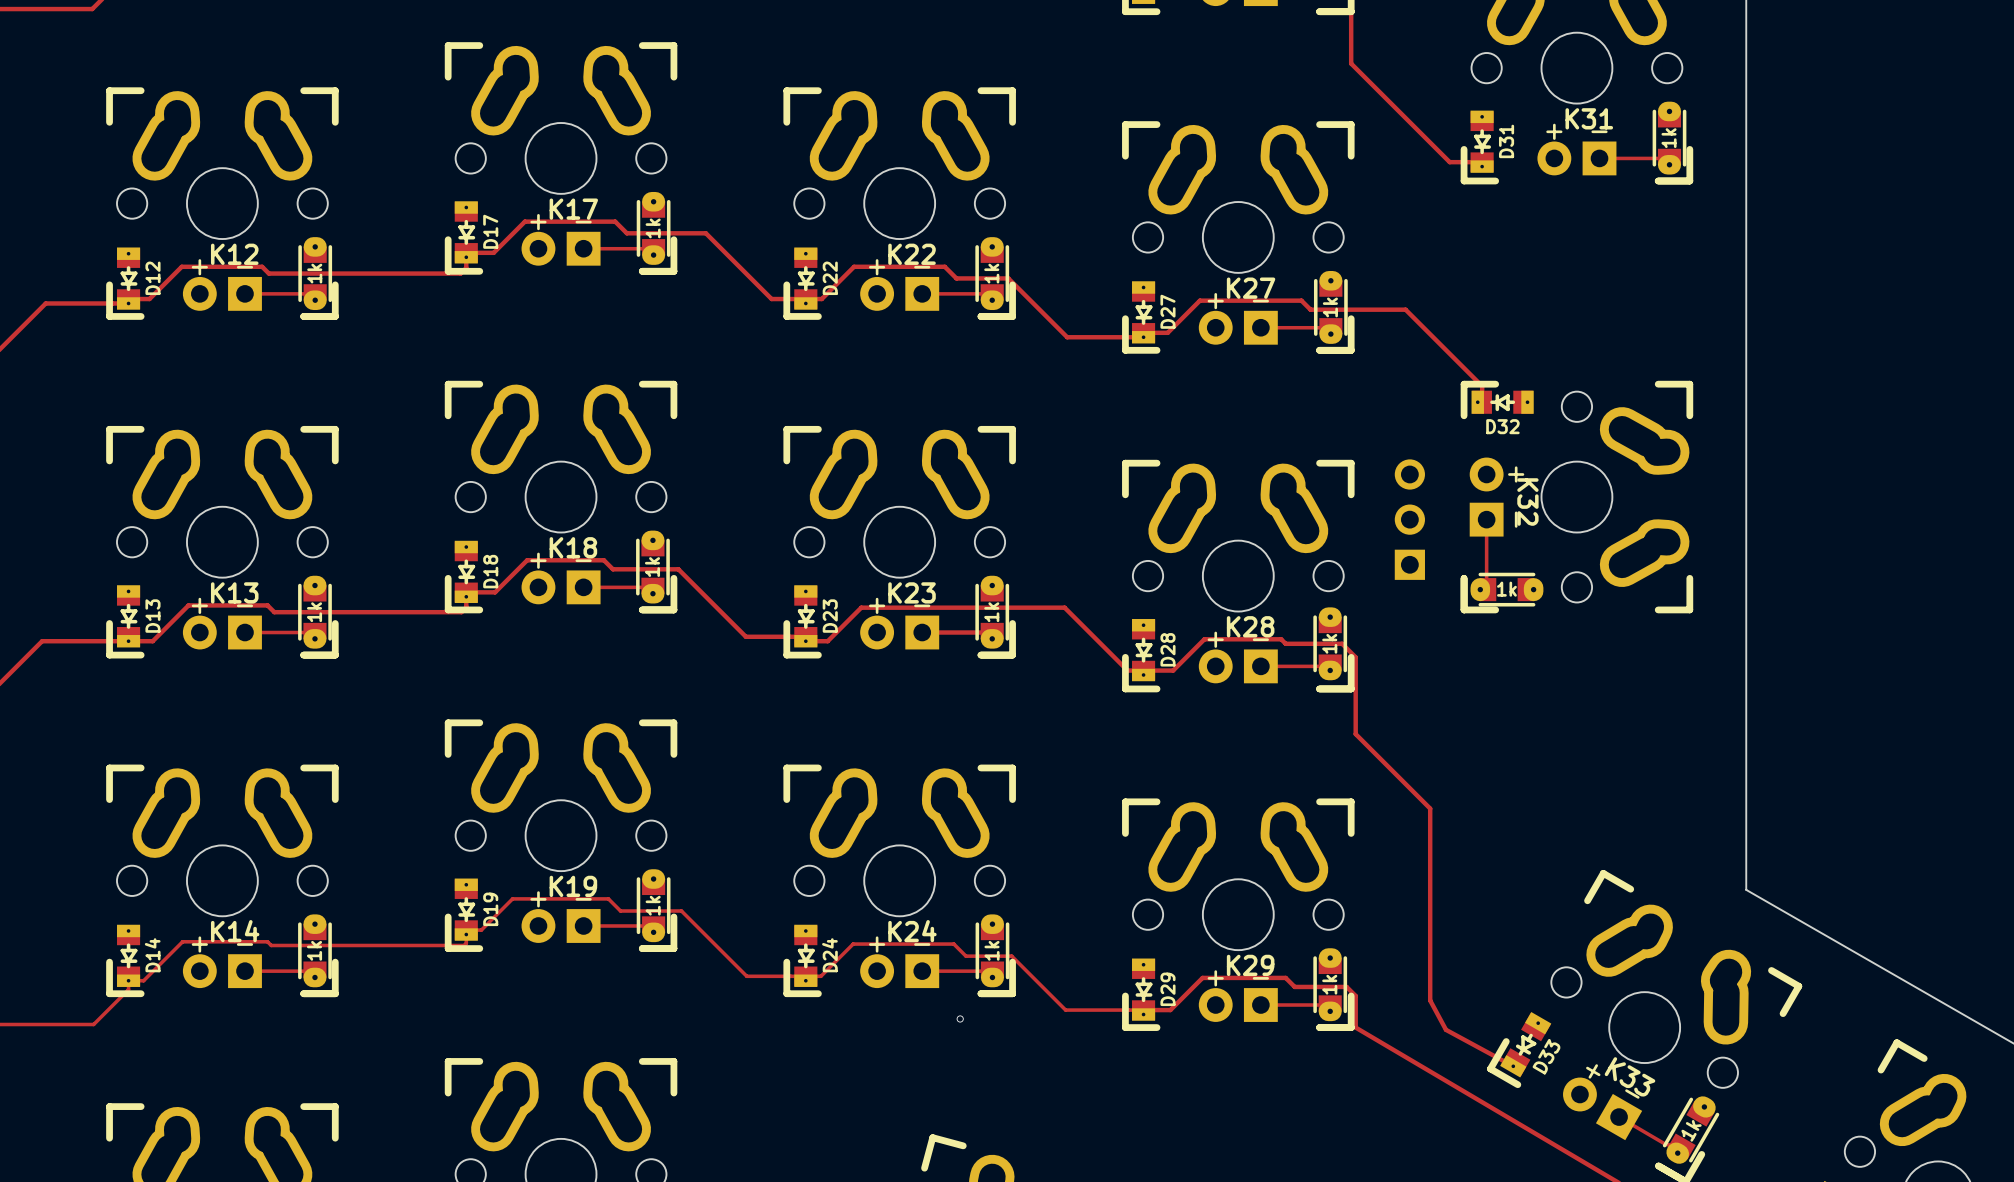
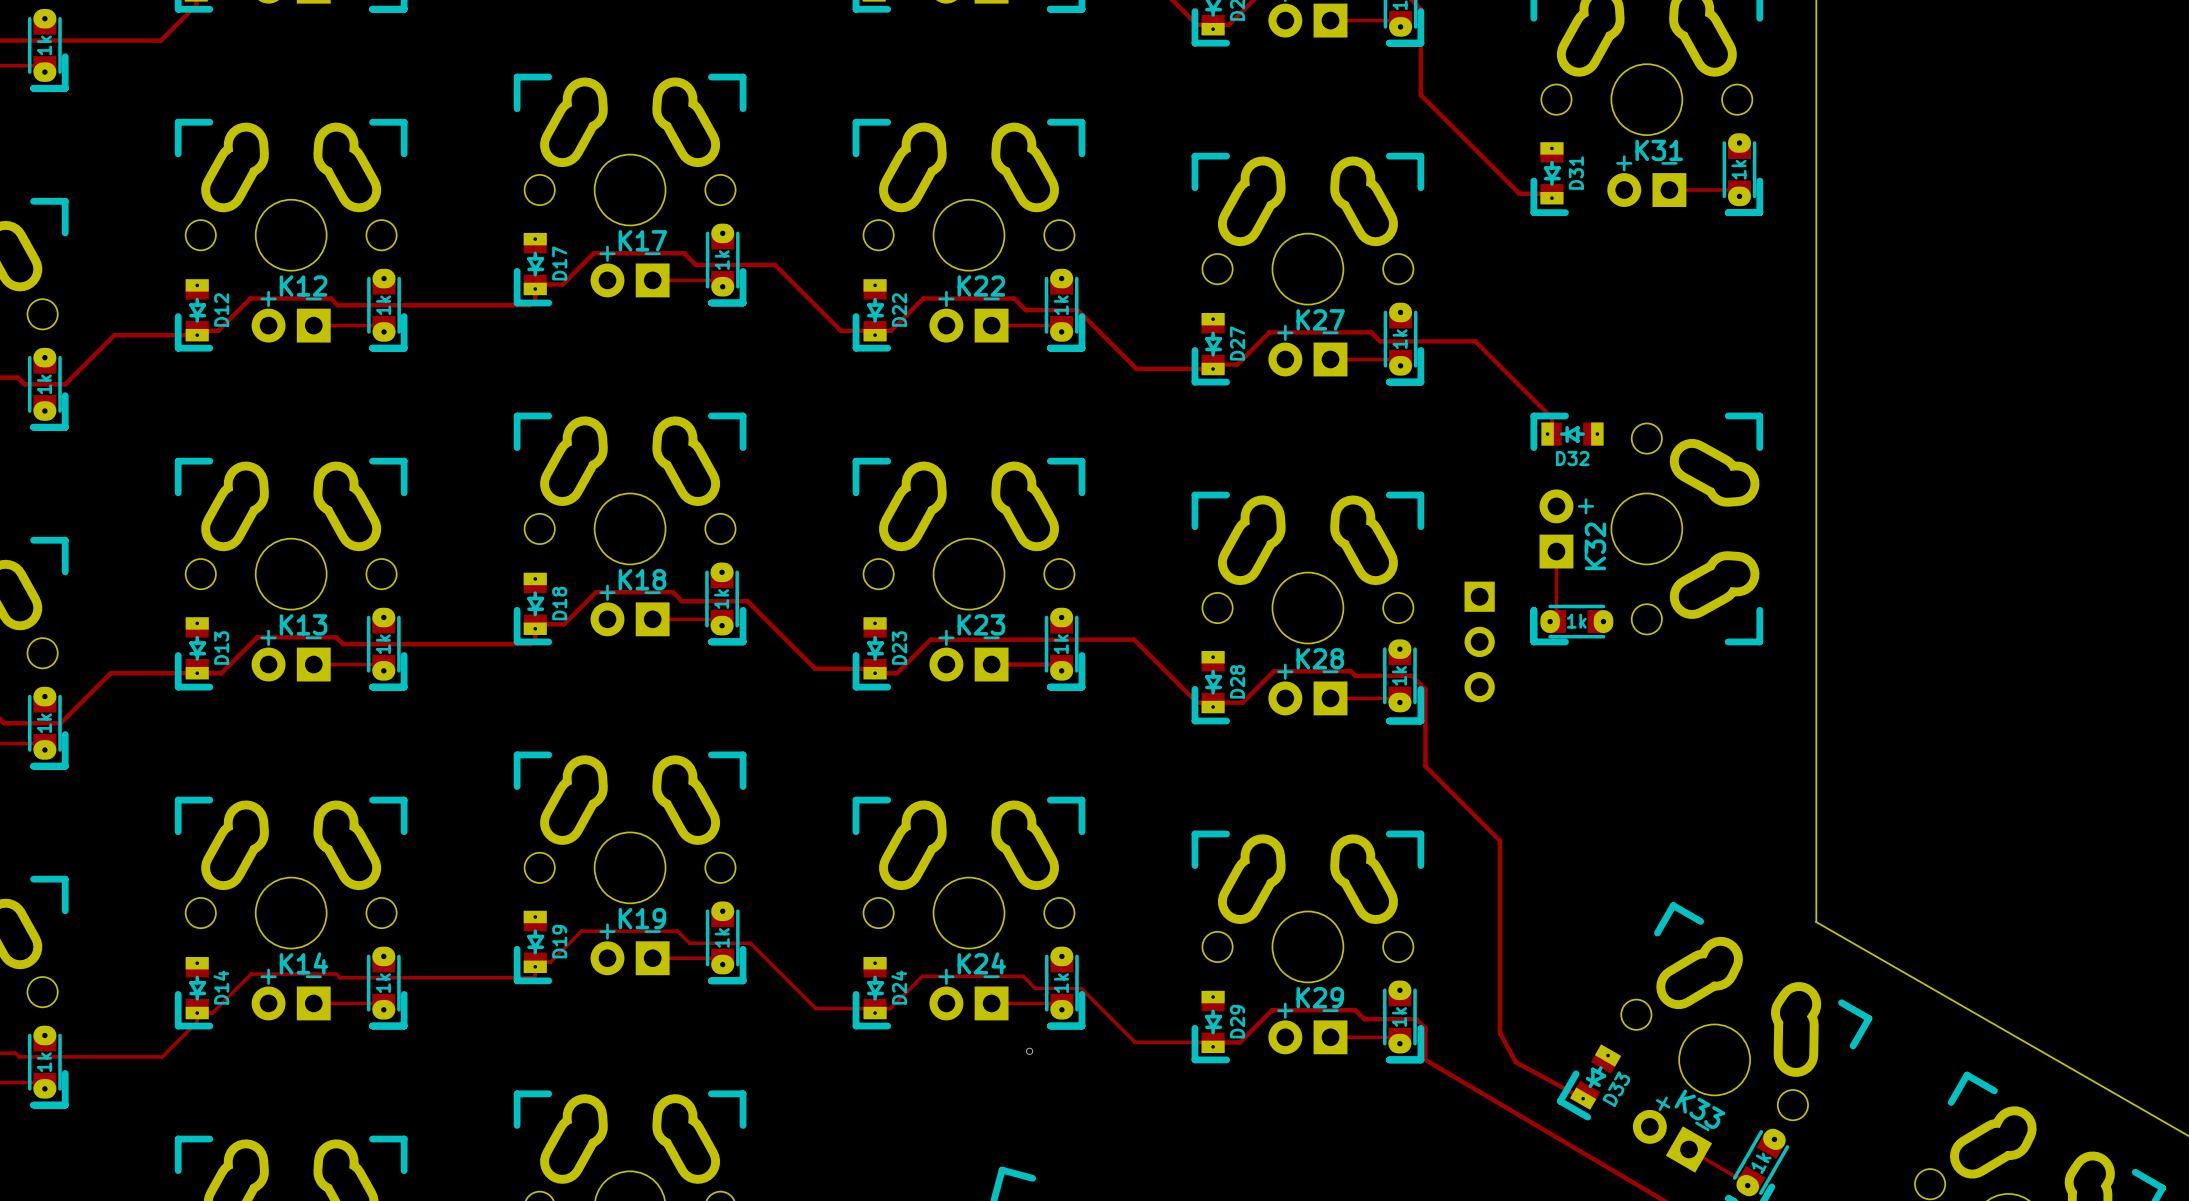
K32 name rotation: 0° (1527, 502) -> 180° (1595, 546)
part rotation: 0° (1409, 519) -> 180° (1479, 641)
part position: (1409, 519) -> (1479, 641)

